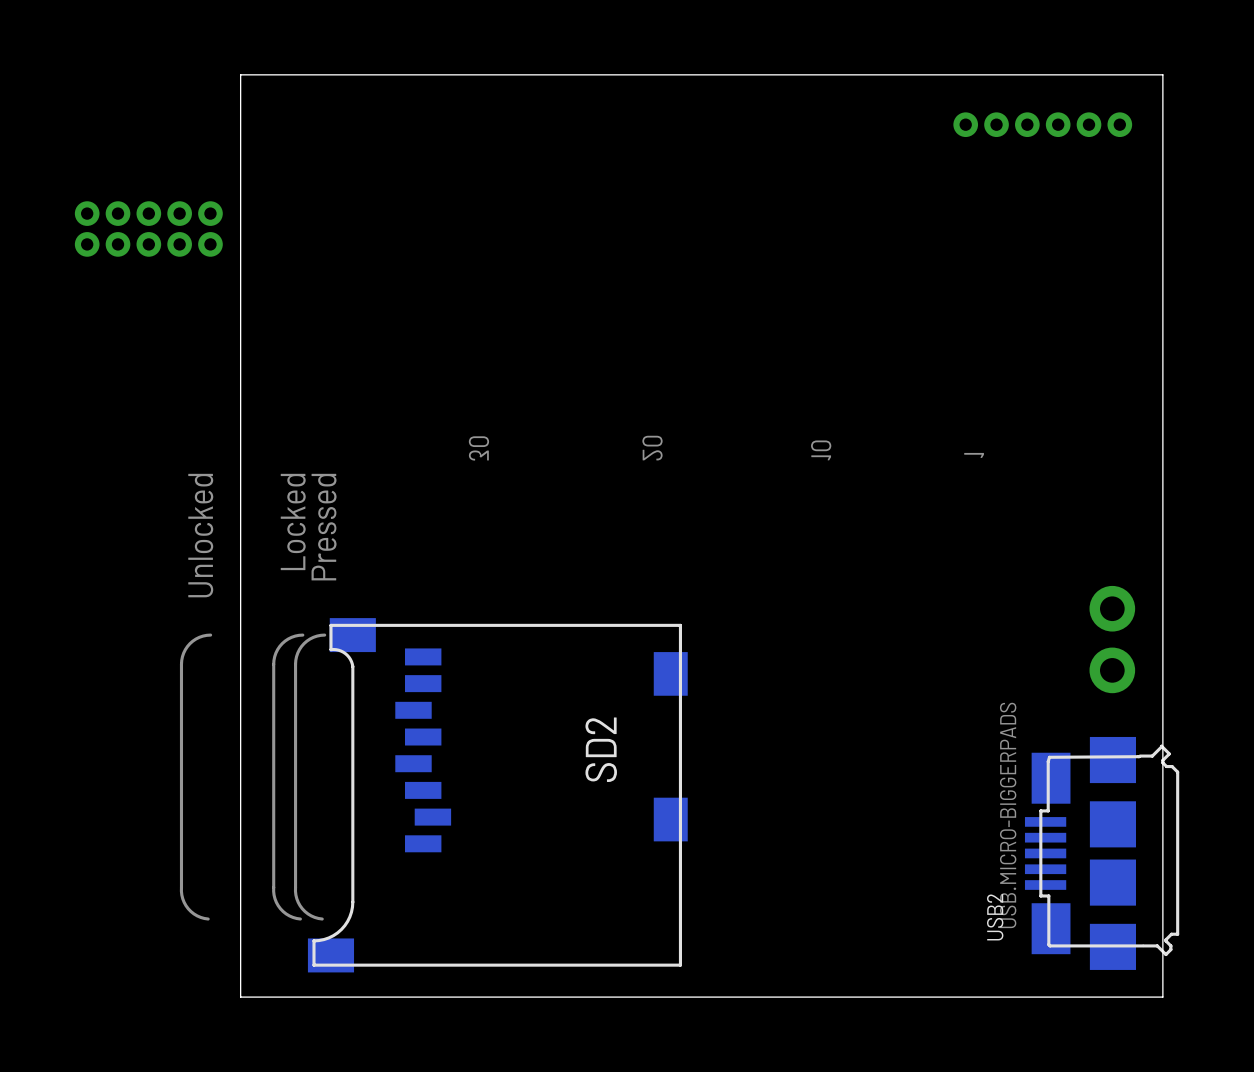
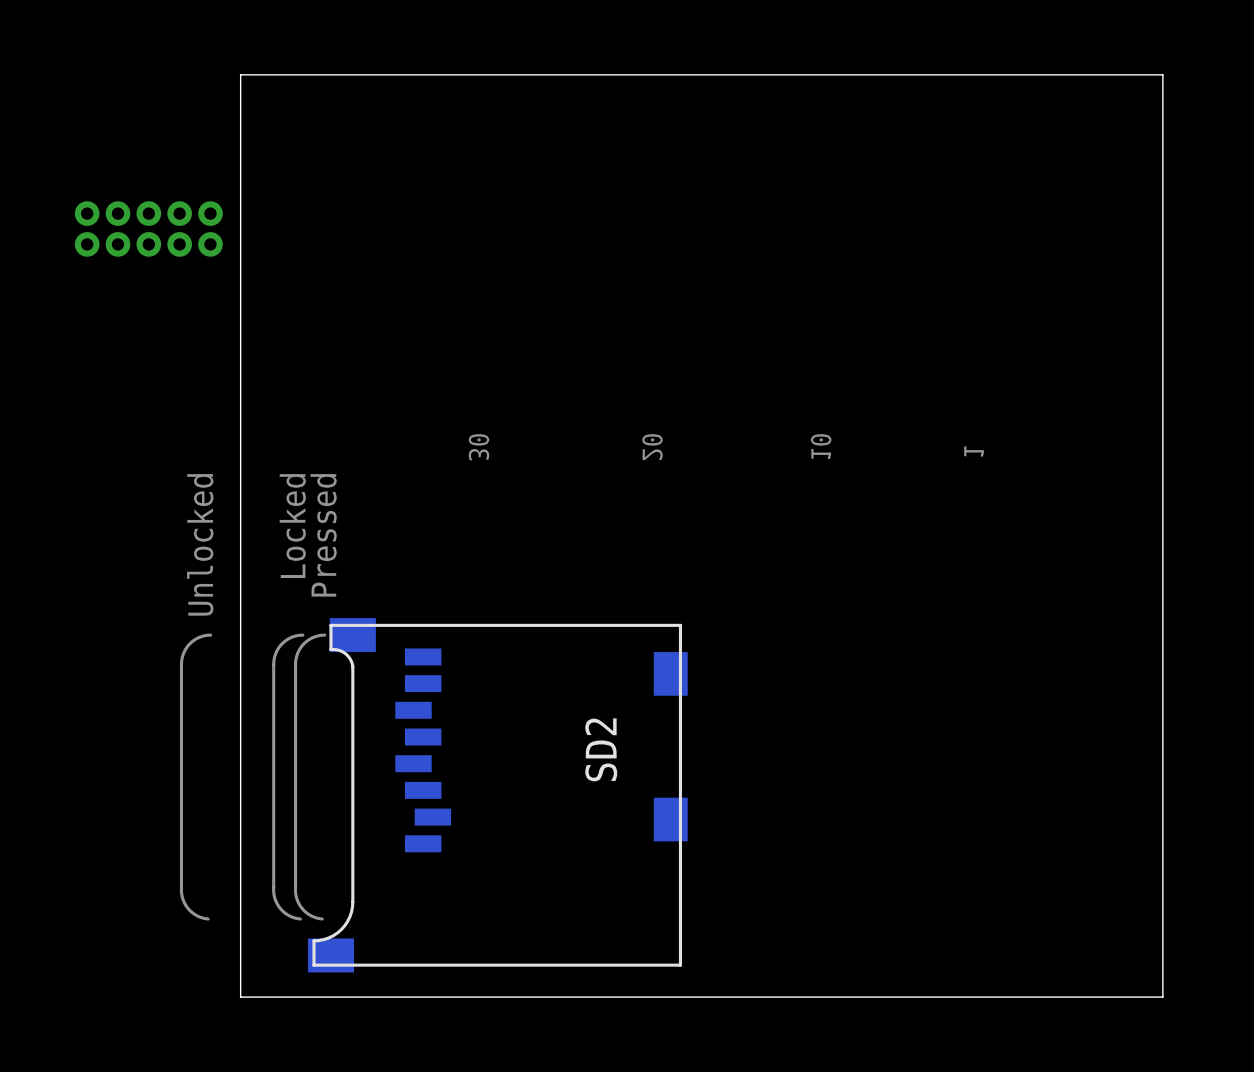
part: (1042, 124) -> none
part: (1112, 639) -> none
USB2: USB.MICRO-BIGGERPADS (1102, 853) -> none

